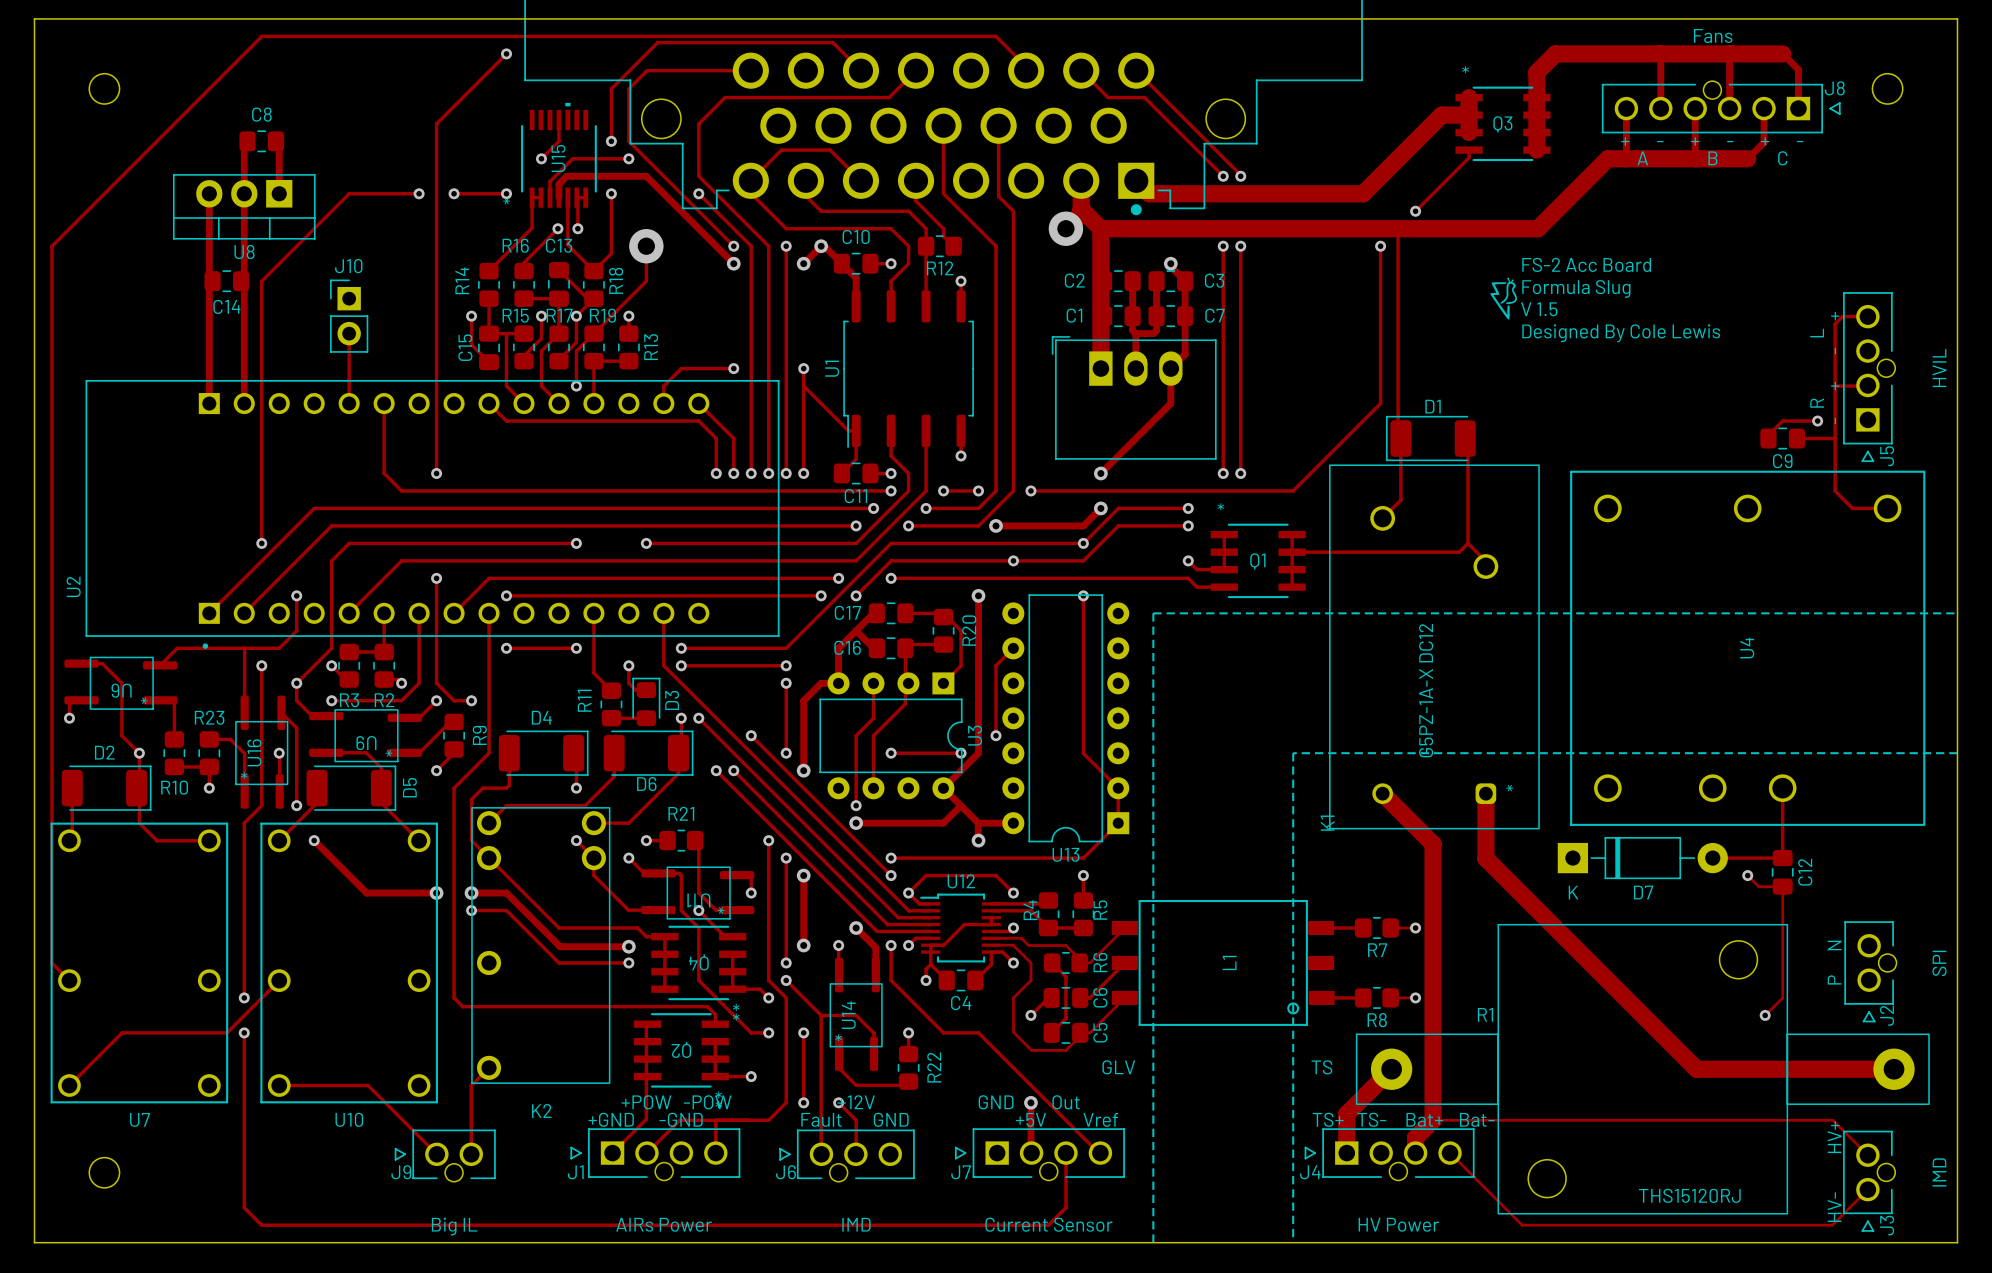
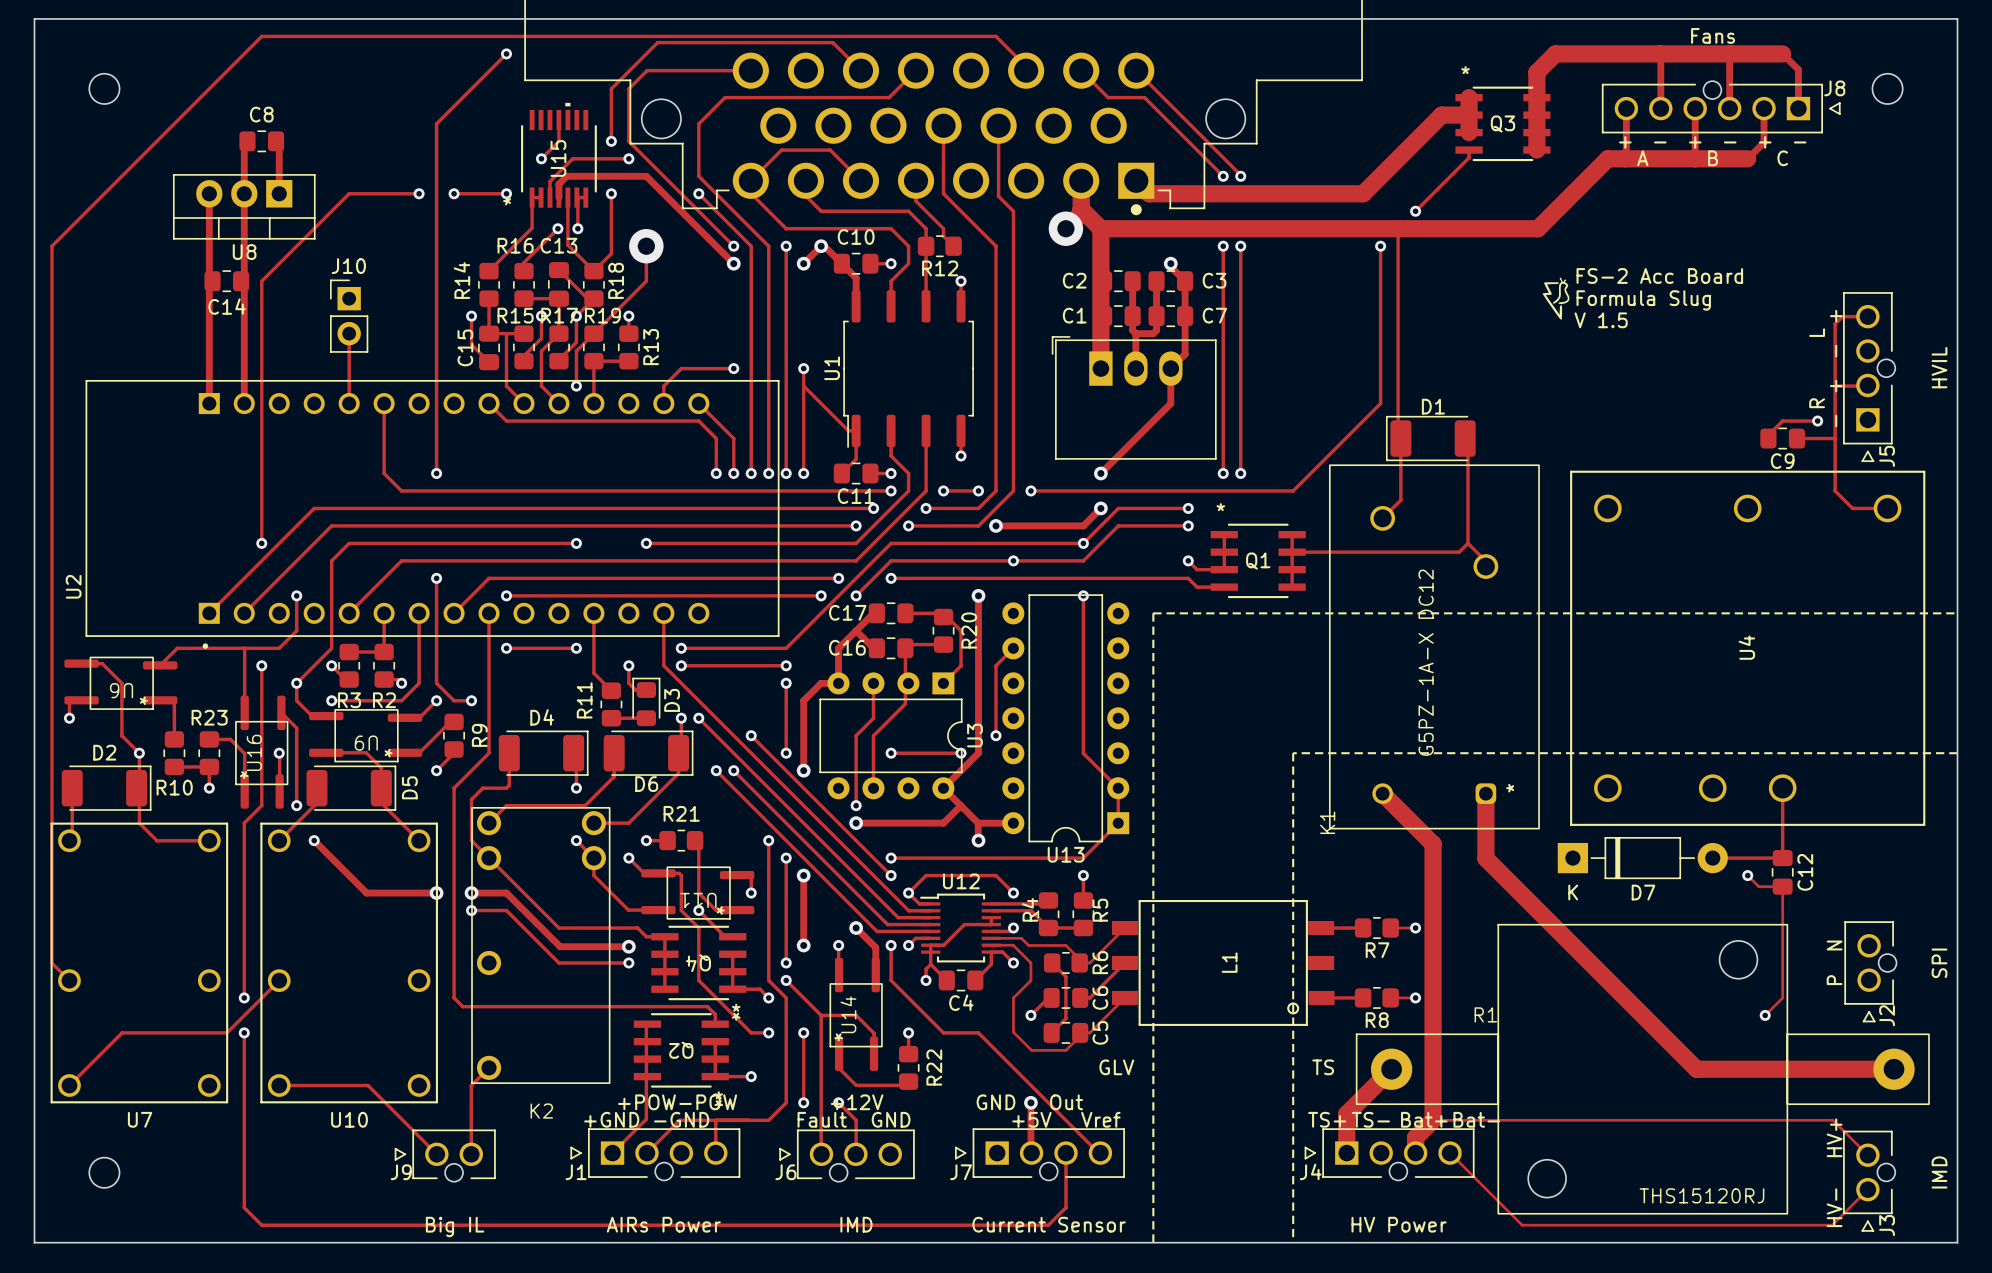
text position: FS-2 Acc Board (1586, 264) -> FS-2 Acc Board (1659, 275)
text position: Formula Slug (1576, 288) -> Formula Slug (1643, 300)
drawing position: (1503, 298) -> (1556, 298)
text position: V 1.5 (1539, 309) -> V 1.5 (1601, 320)
text: Designed By Cole Lewis (1621, 333) -> none

